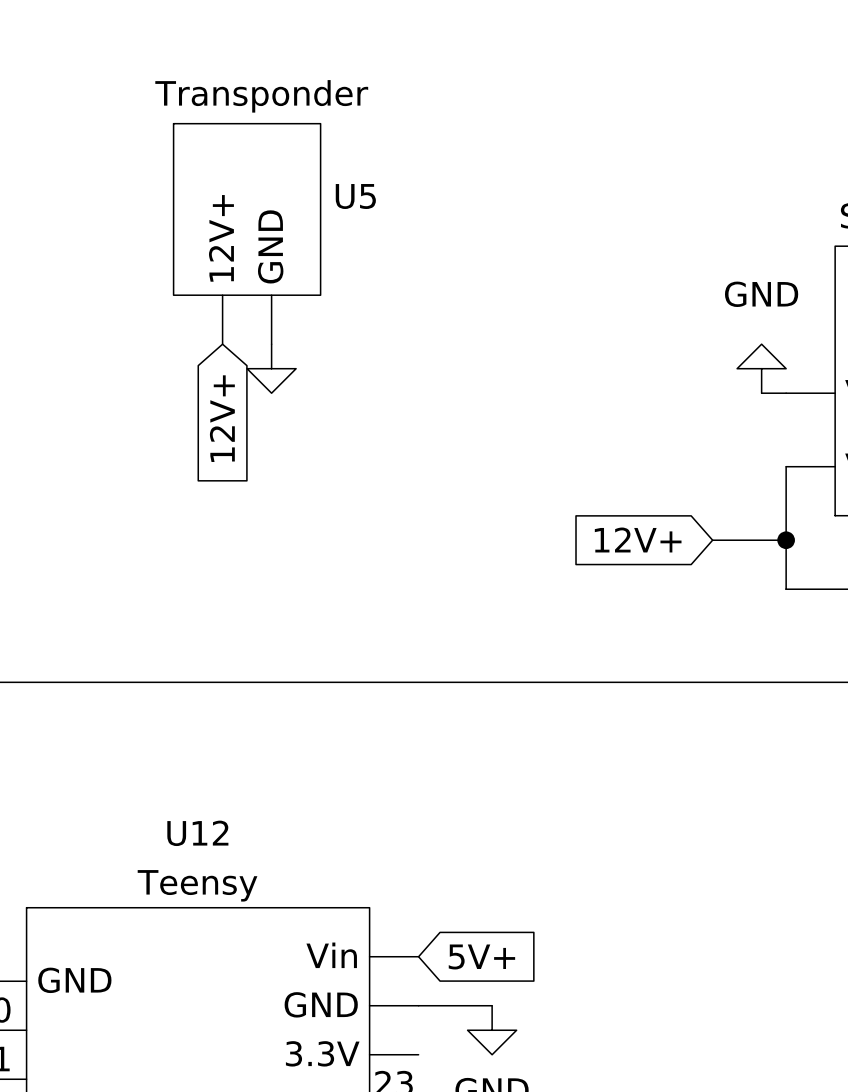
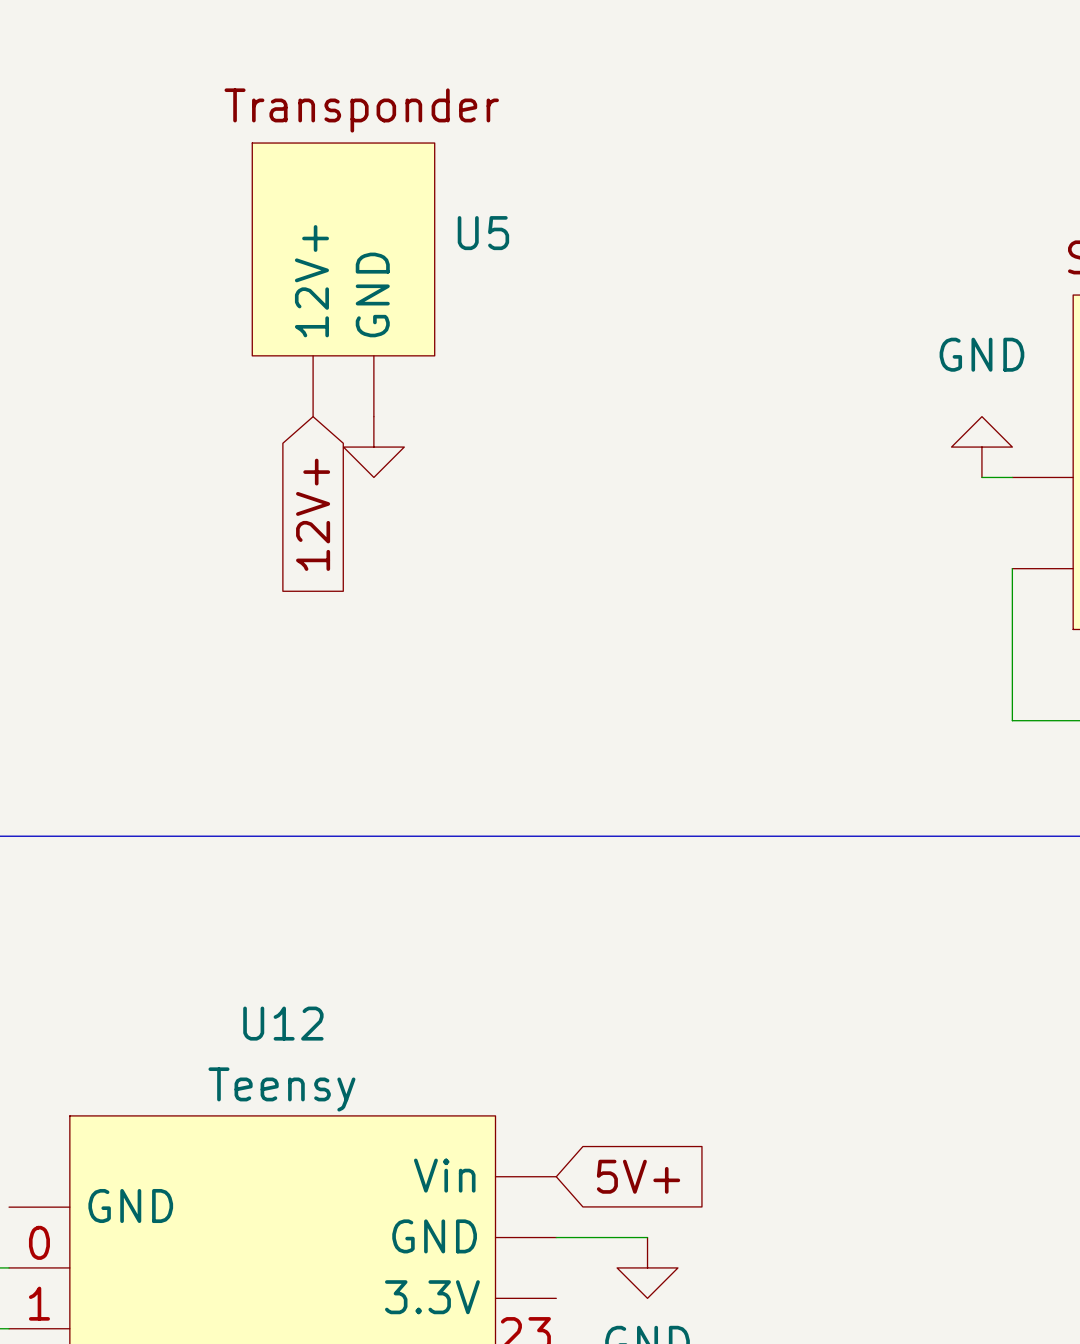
global label: 12V+ (638, 539) -> none
wire: (712, 540) (786, 540) -> none
junction: (786, 540) -> none

